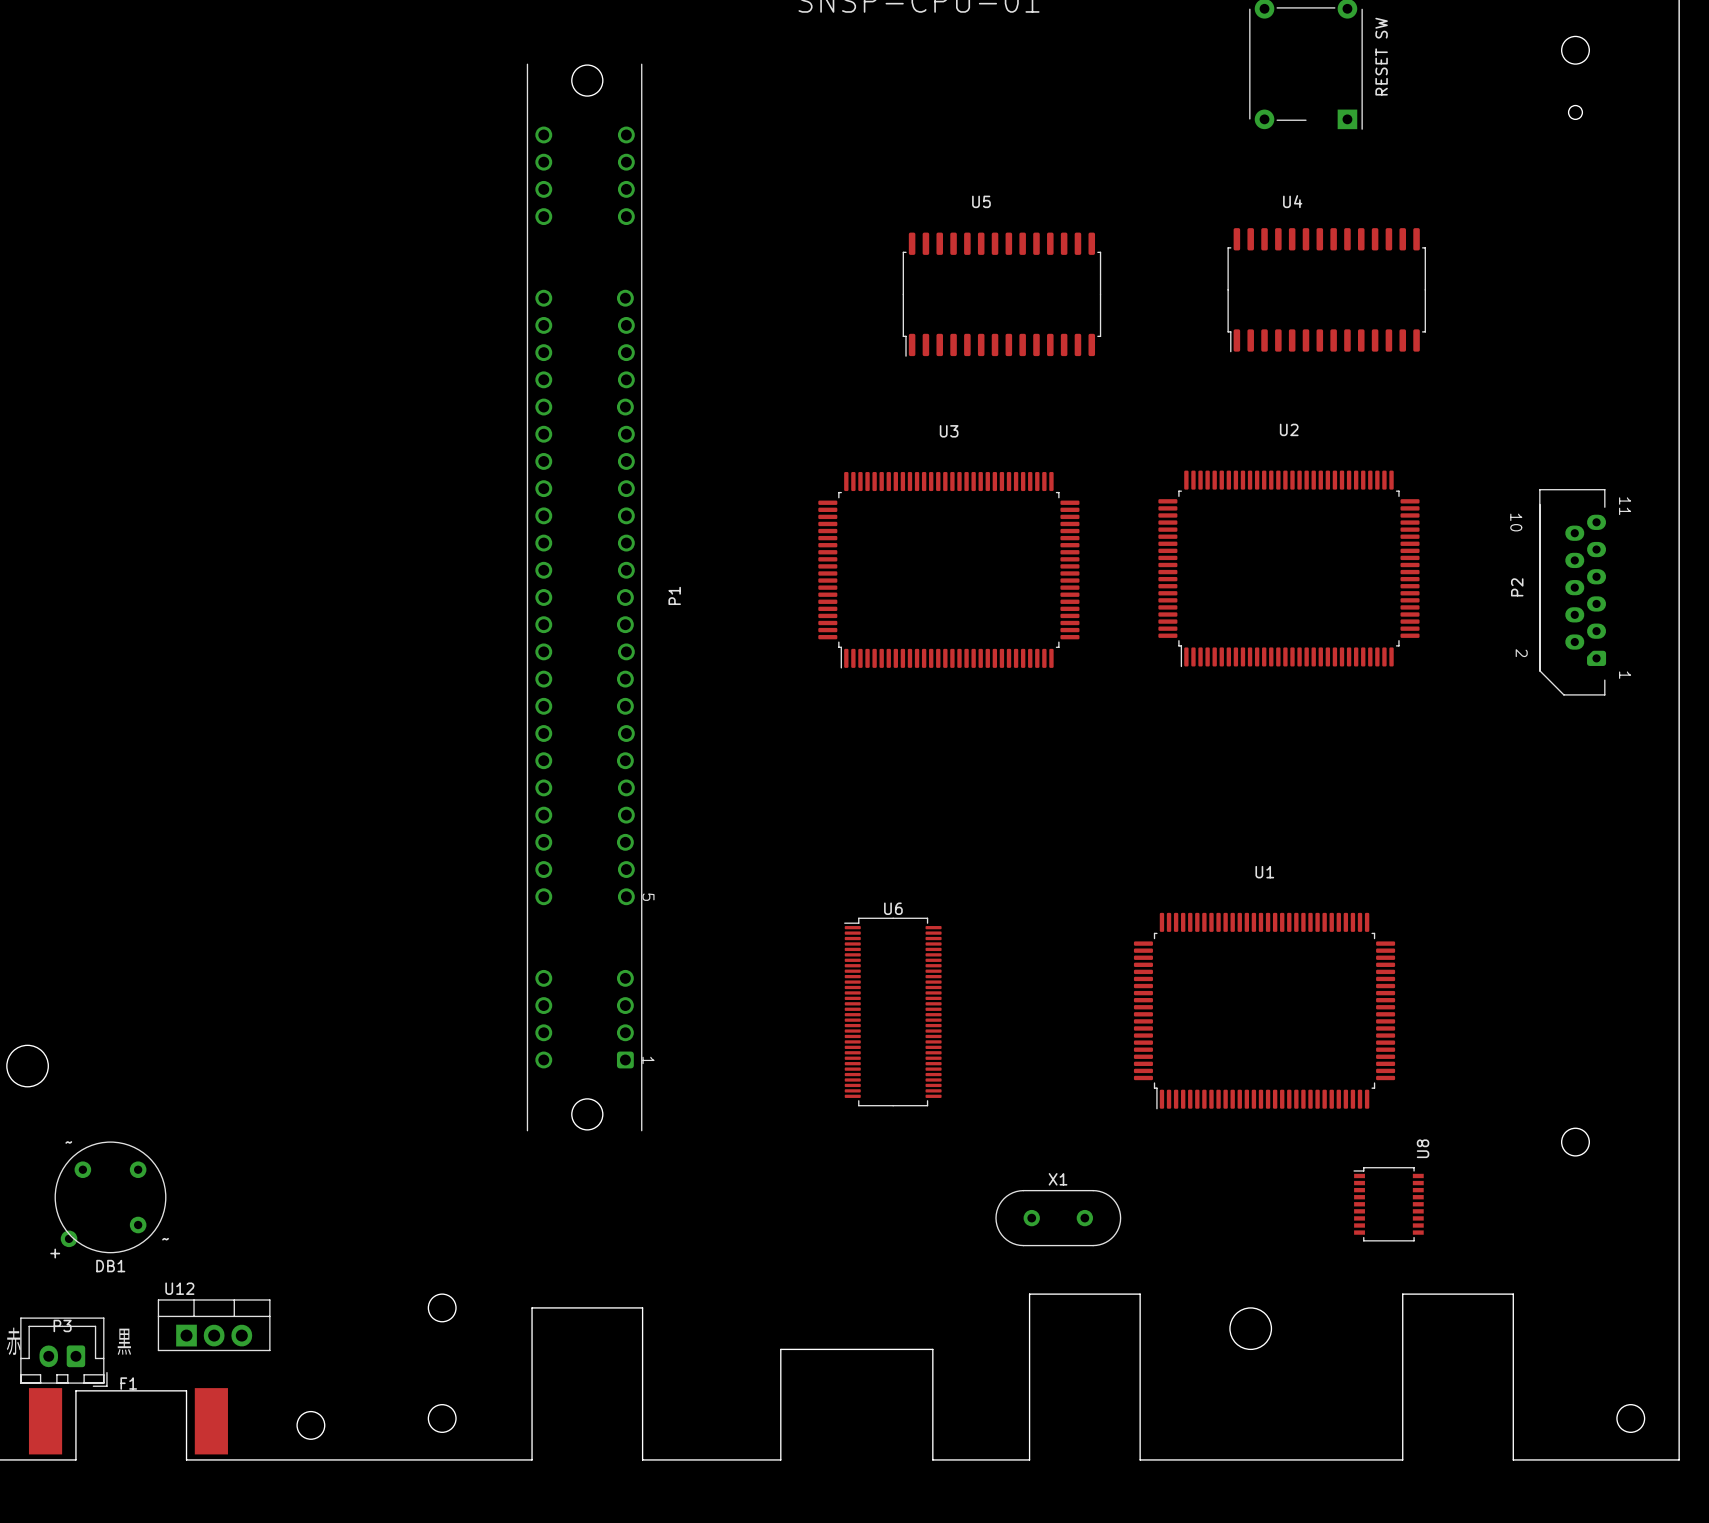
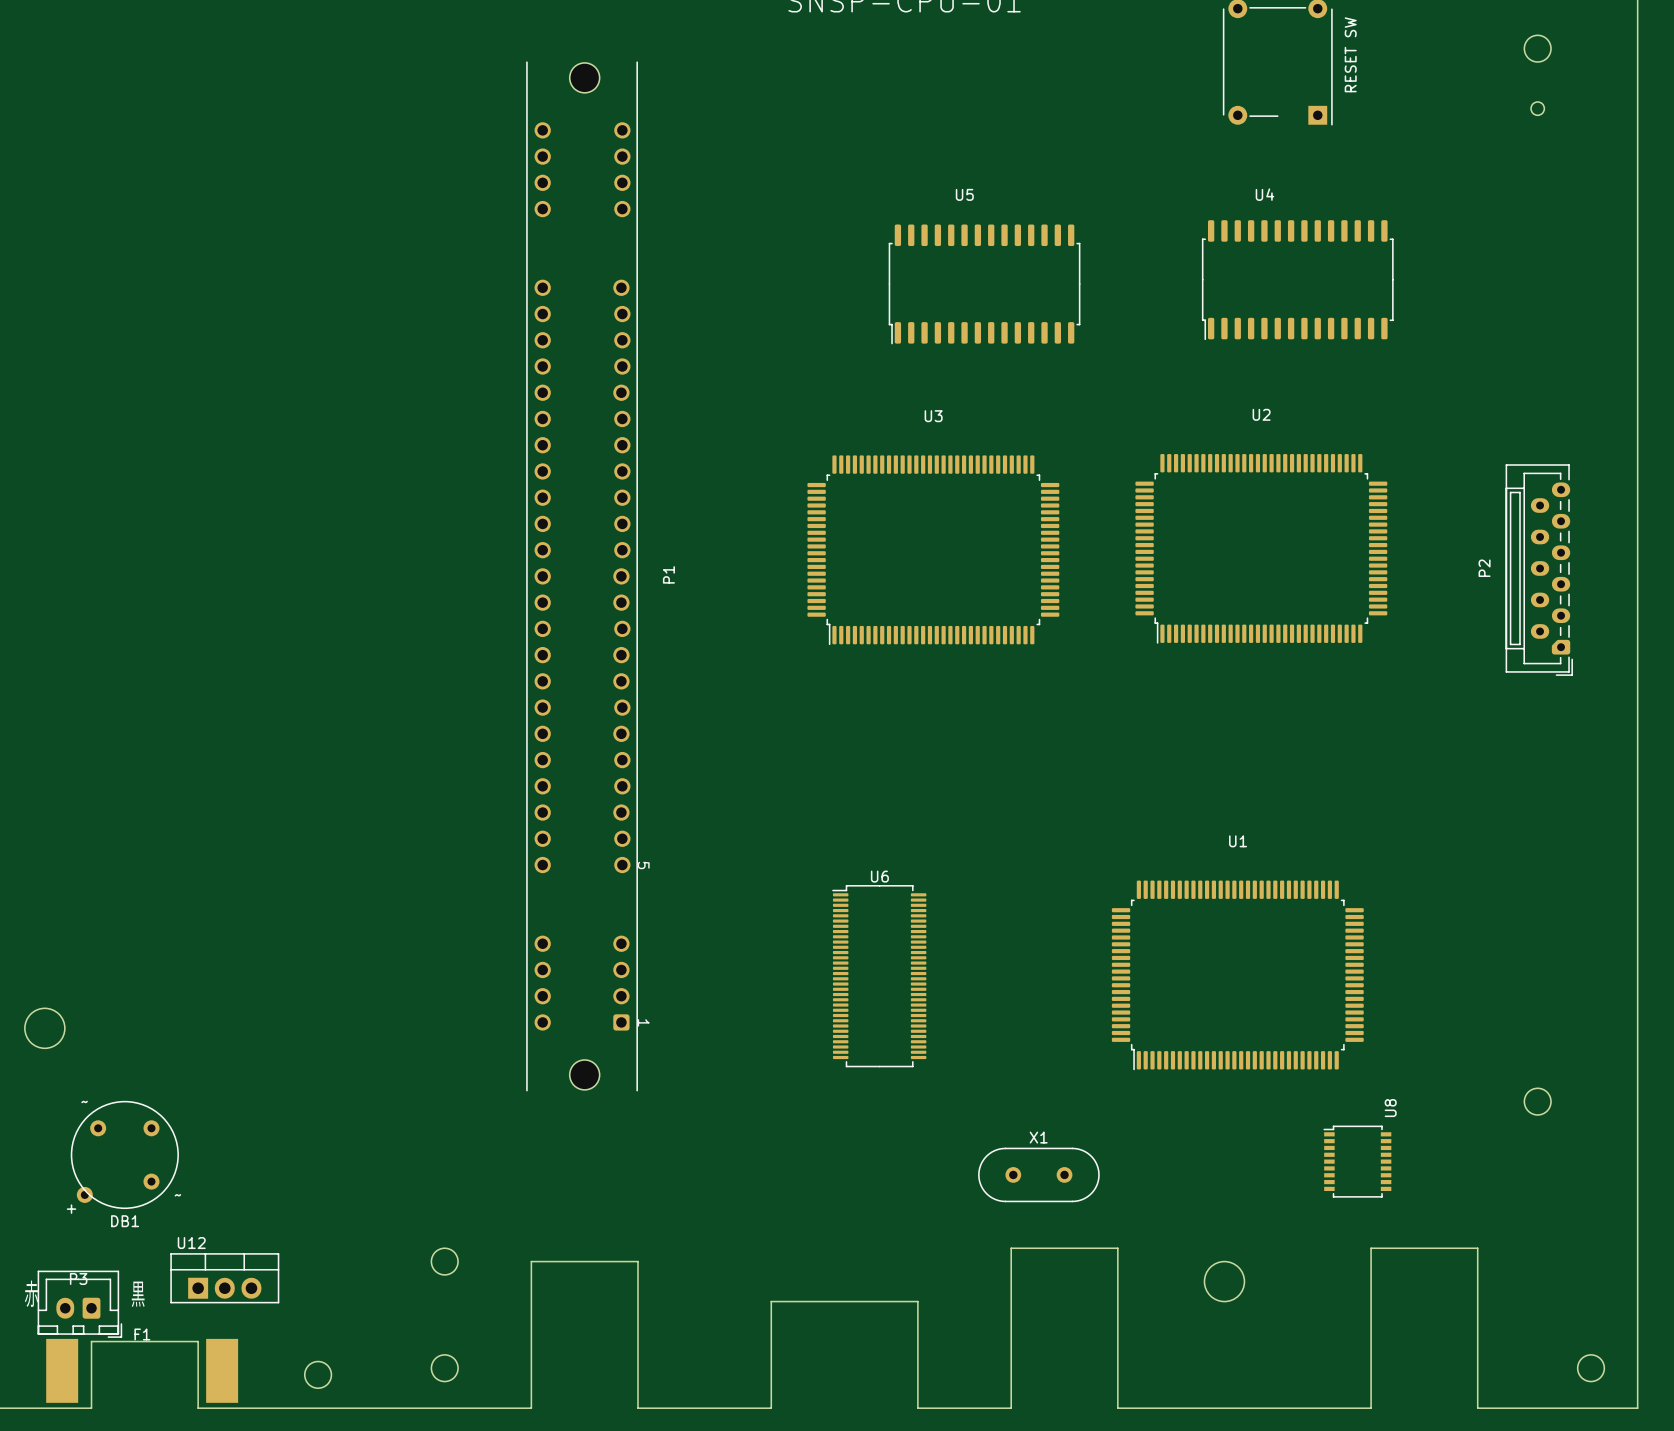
P2 footprint: [1539, 489, 1607, 696] -> [1505, 464, 1573, 676]

